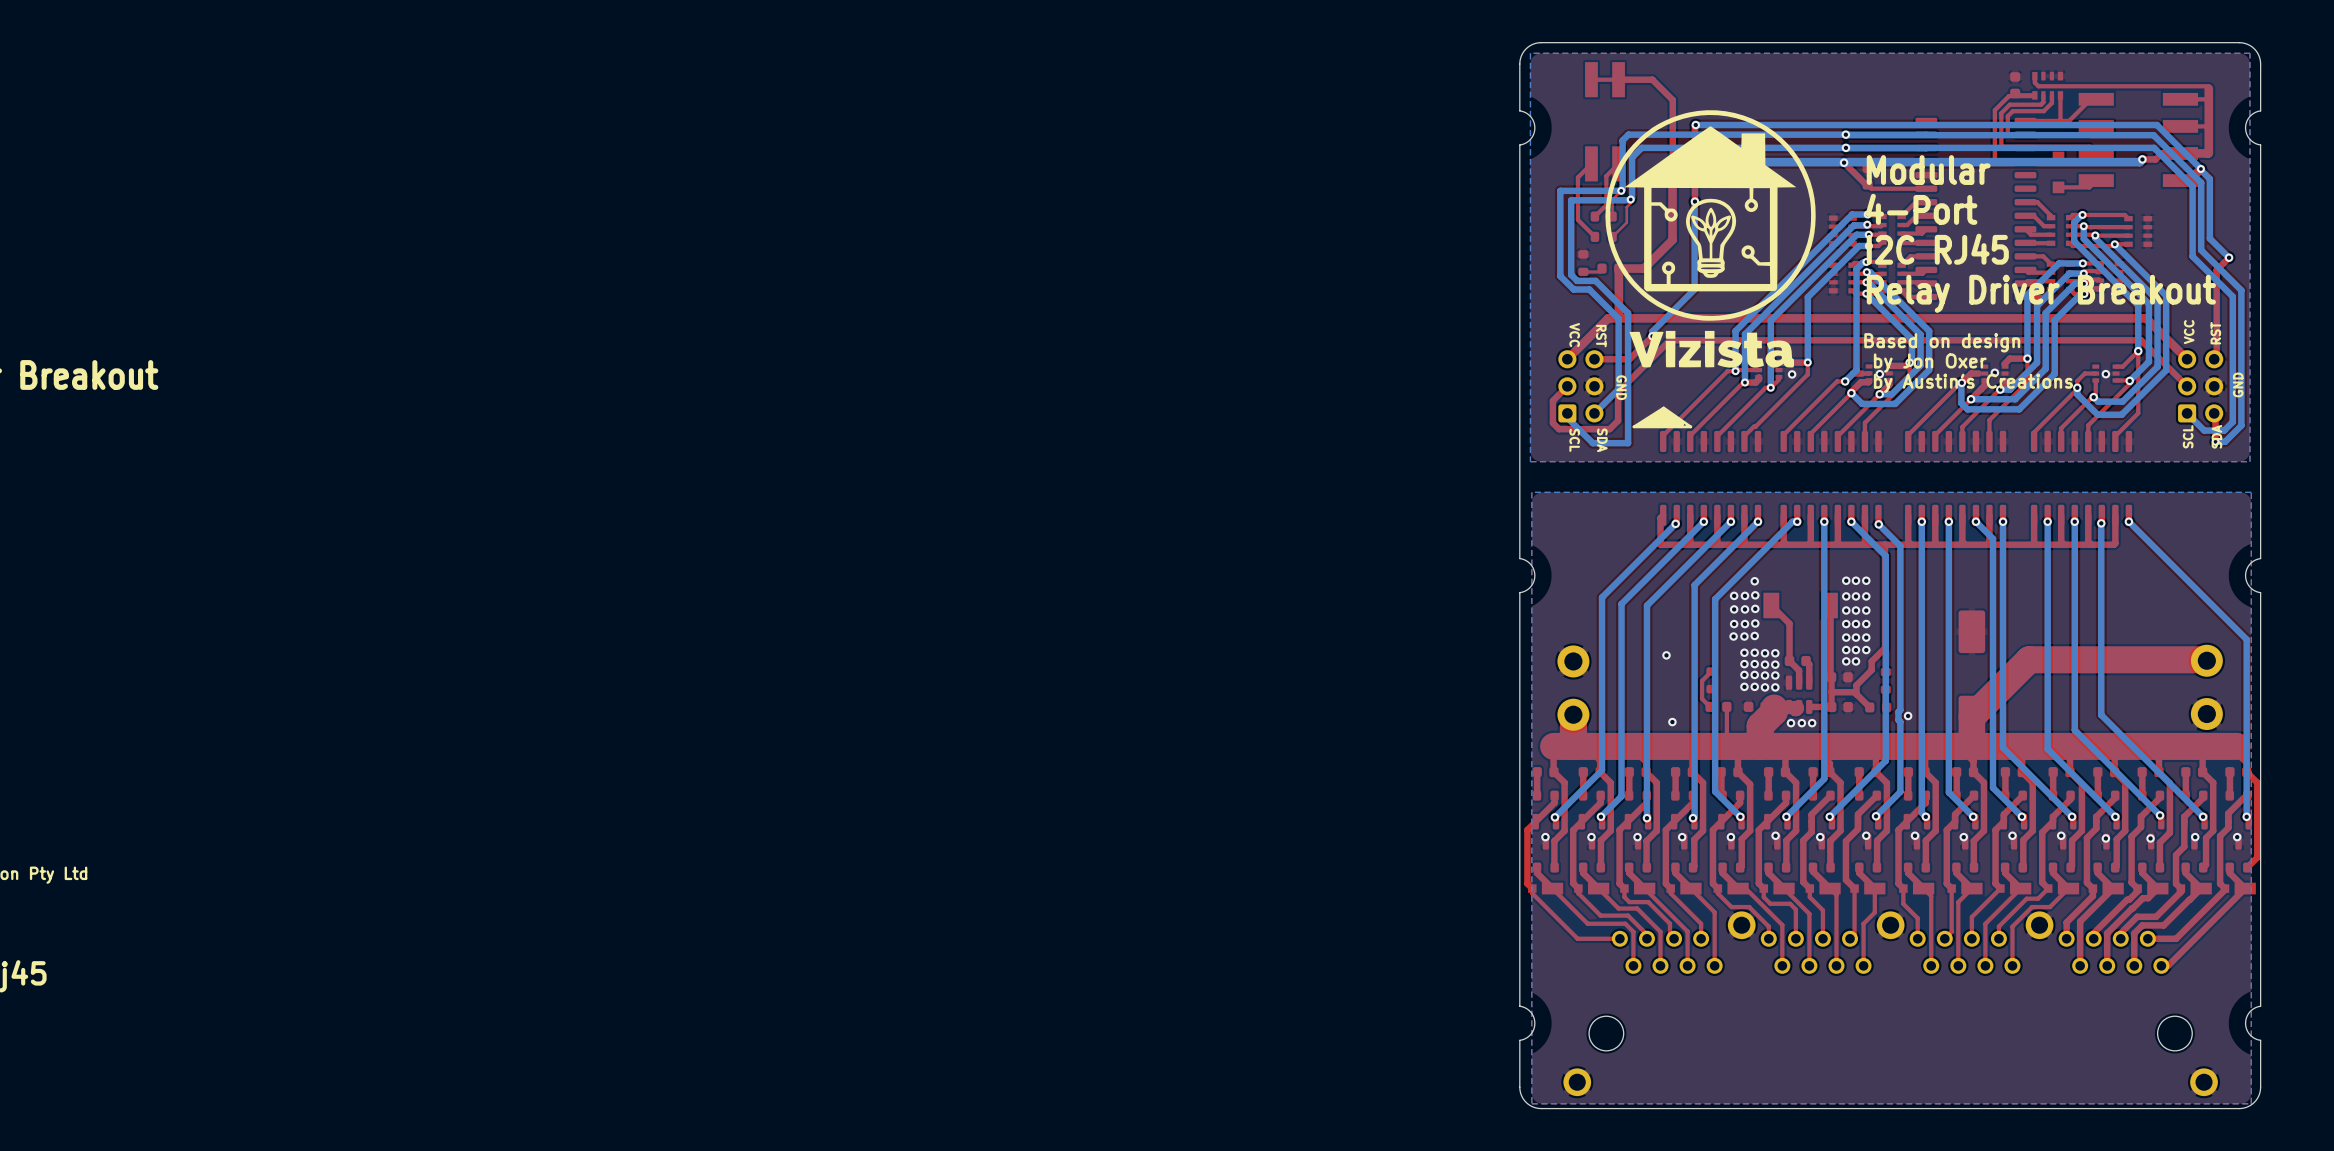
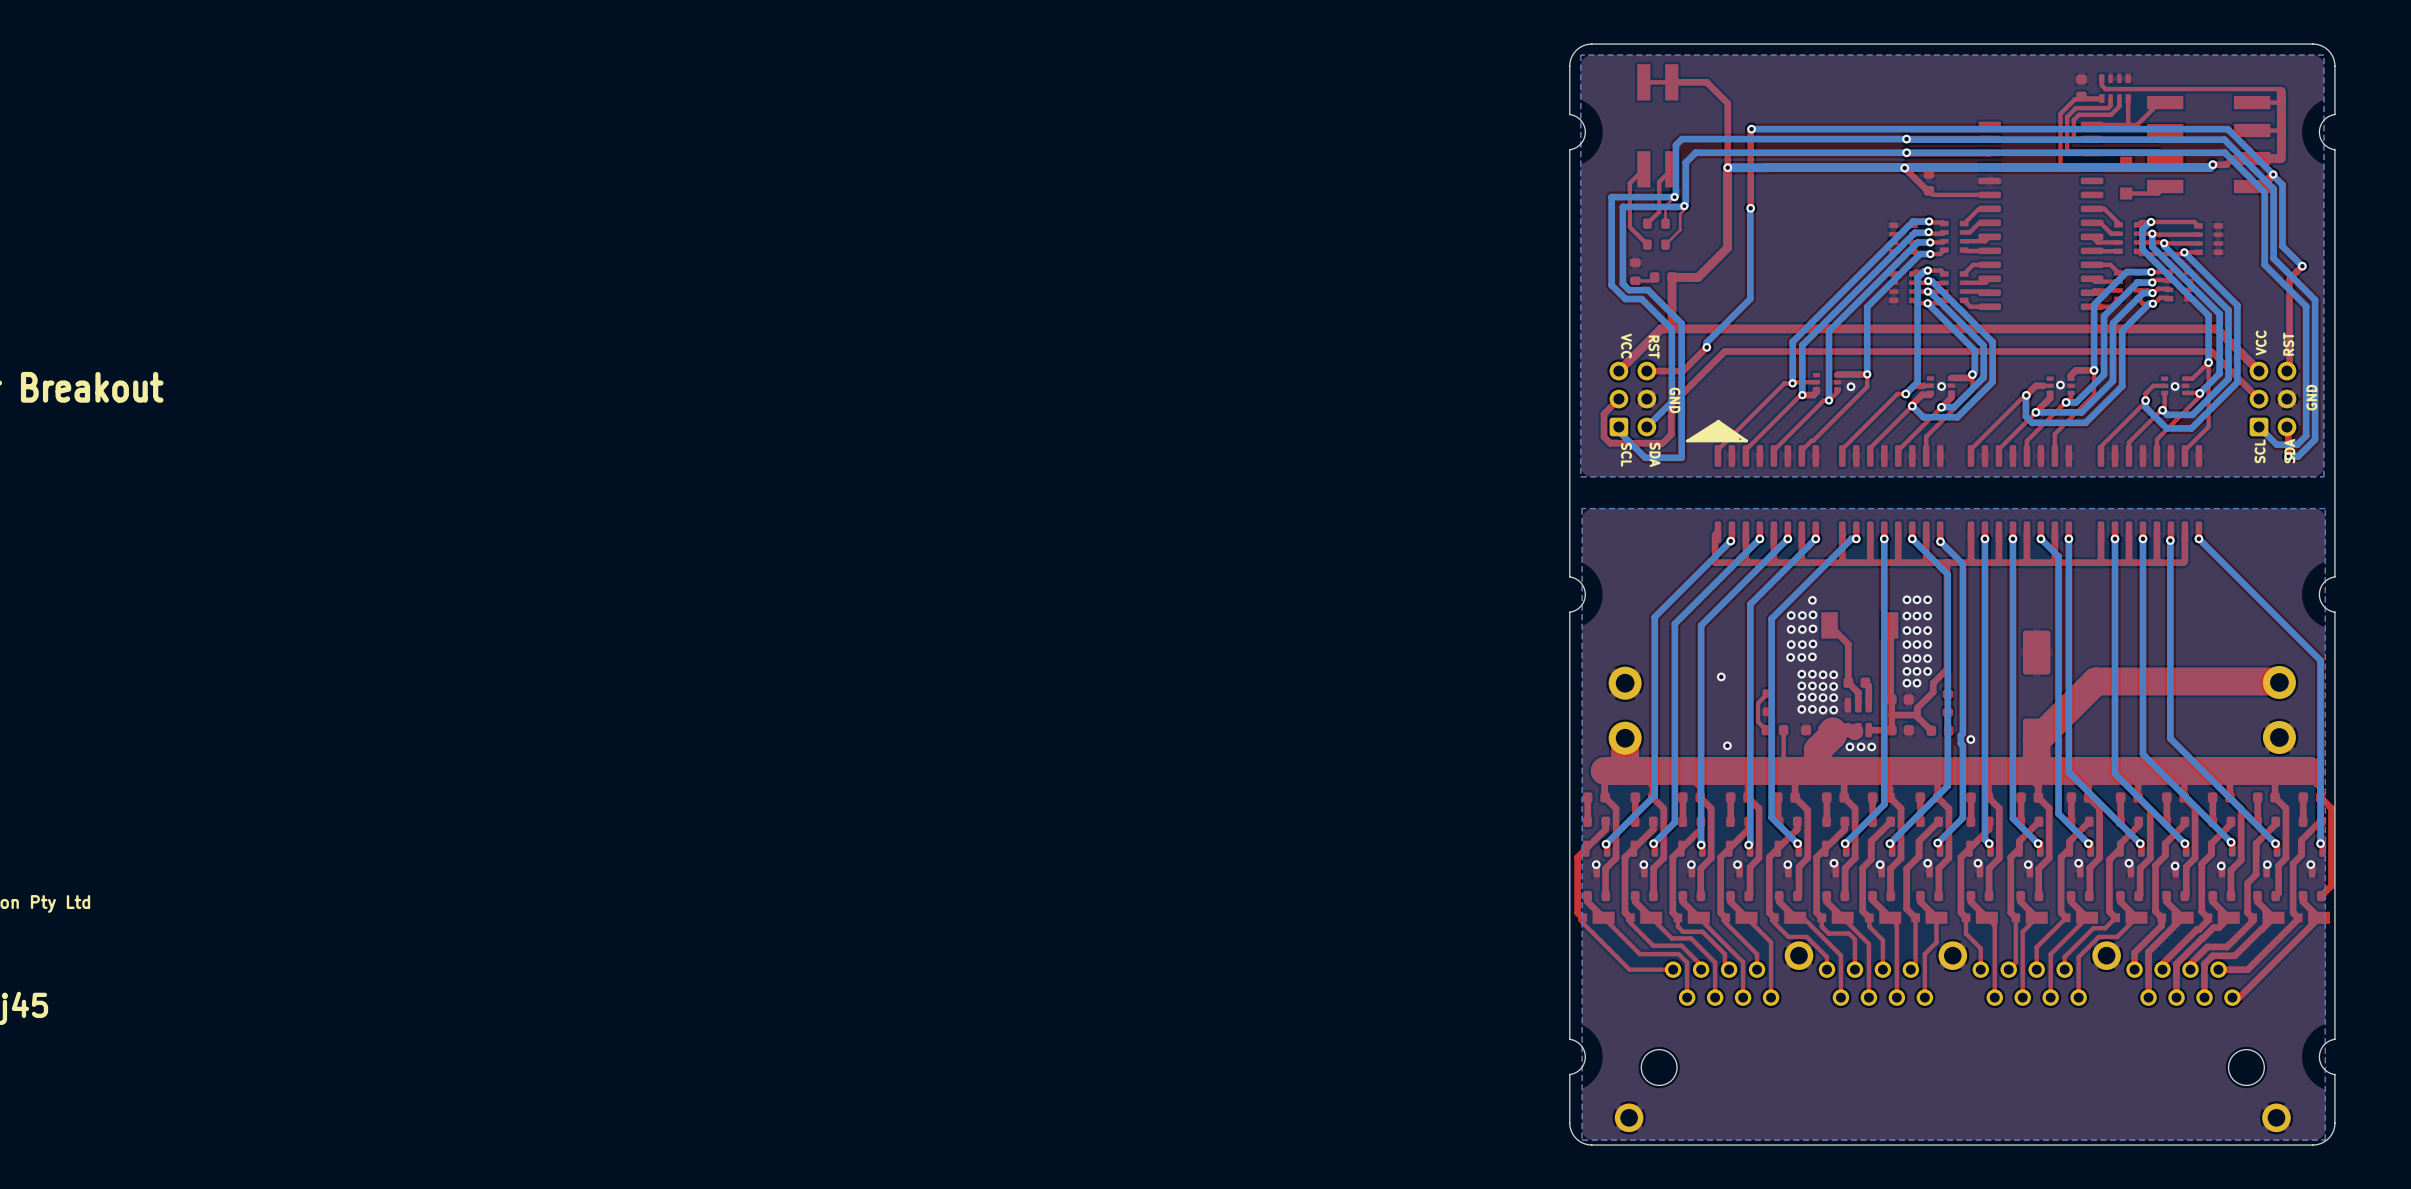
drawing: [1605, 110, 1816, 368] -> none
text: Modular (1928, 170) -> none
text: 4-Port (1921, 209) -> none
text: I2C RJ45 (1937, 249) -> none
text: Relay Driver Breakout (2041, 293) -> none
text: Based on design (1942, 342) -> none
text: by Jon Oxer (1930, 363) -> none
text: by Austin's Creations (1973, 383) -> none

